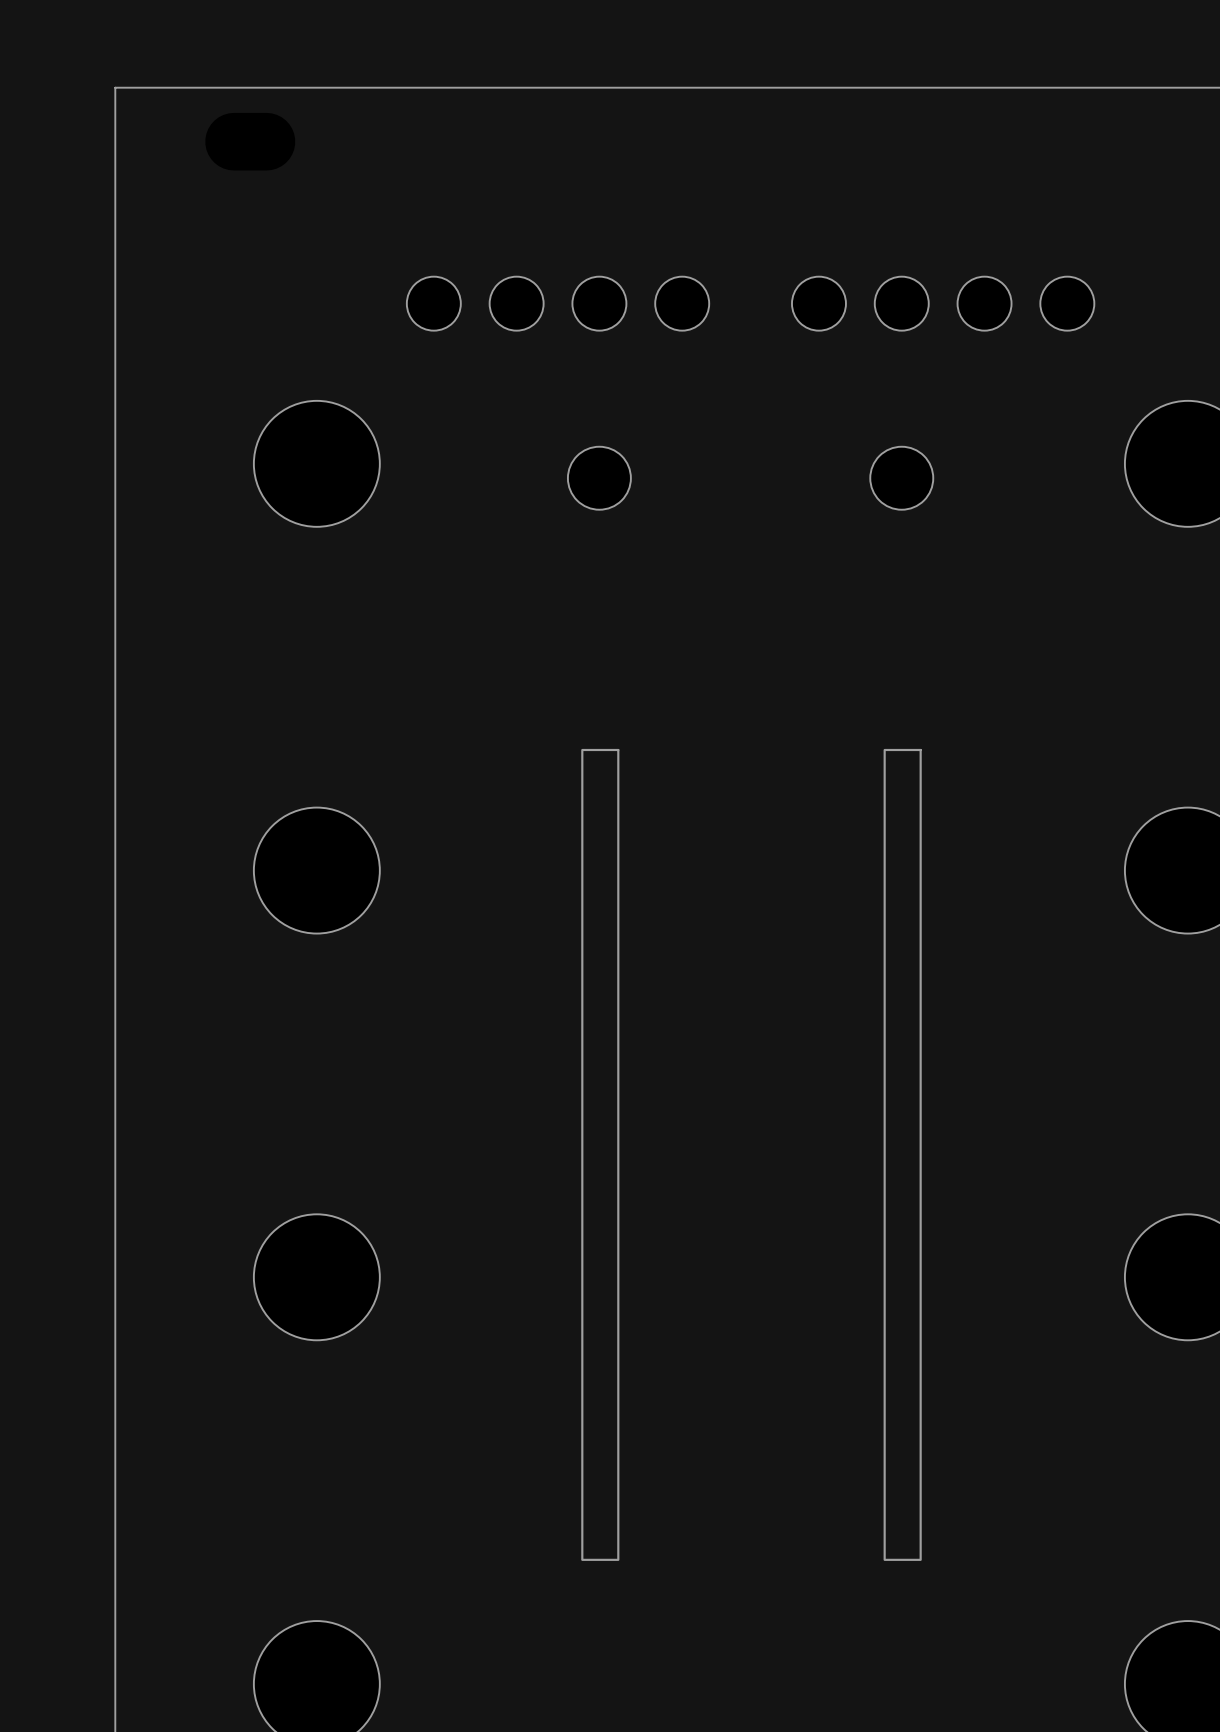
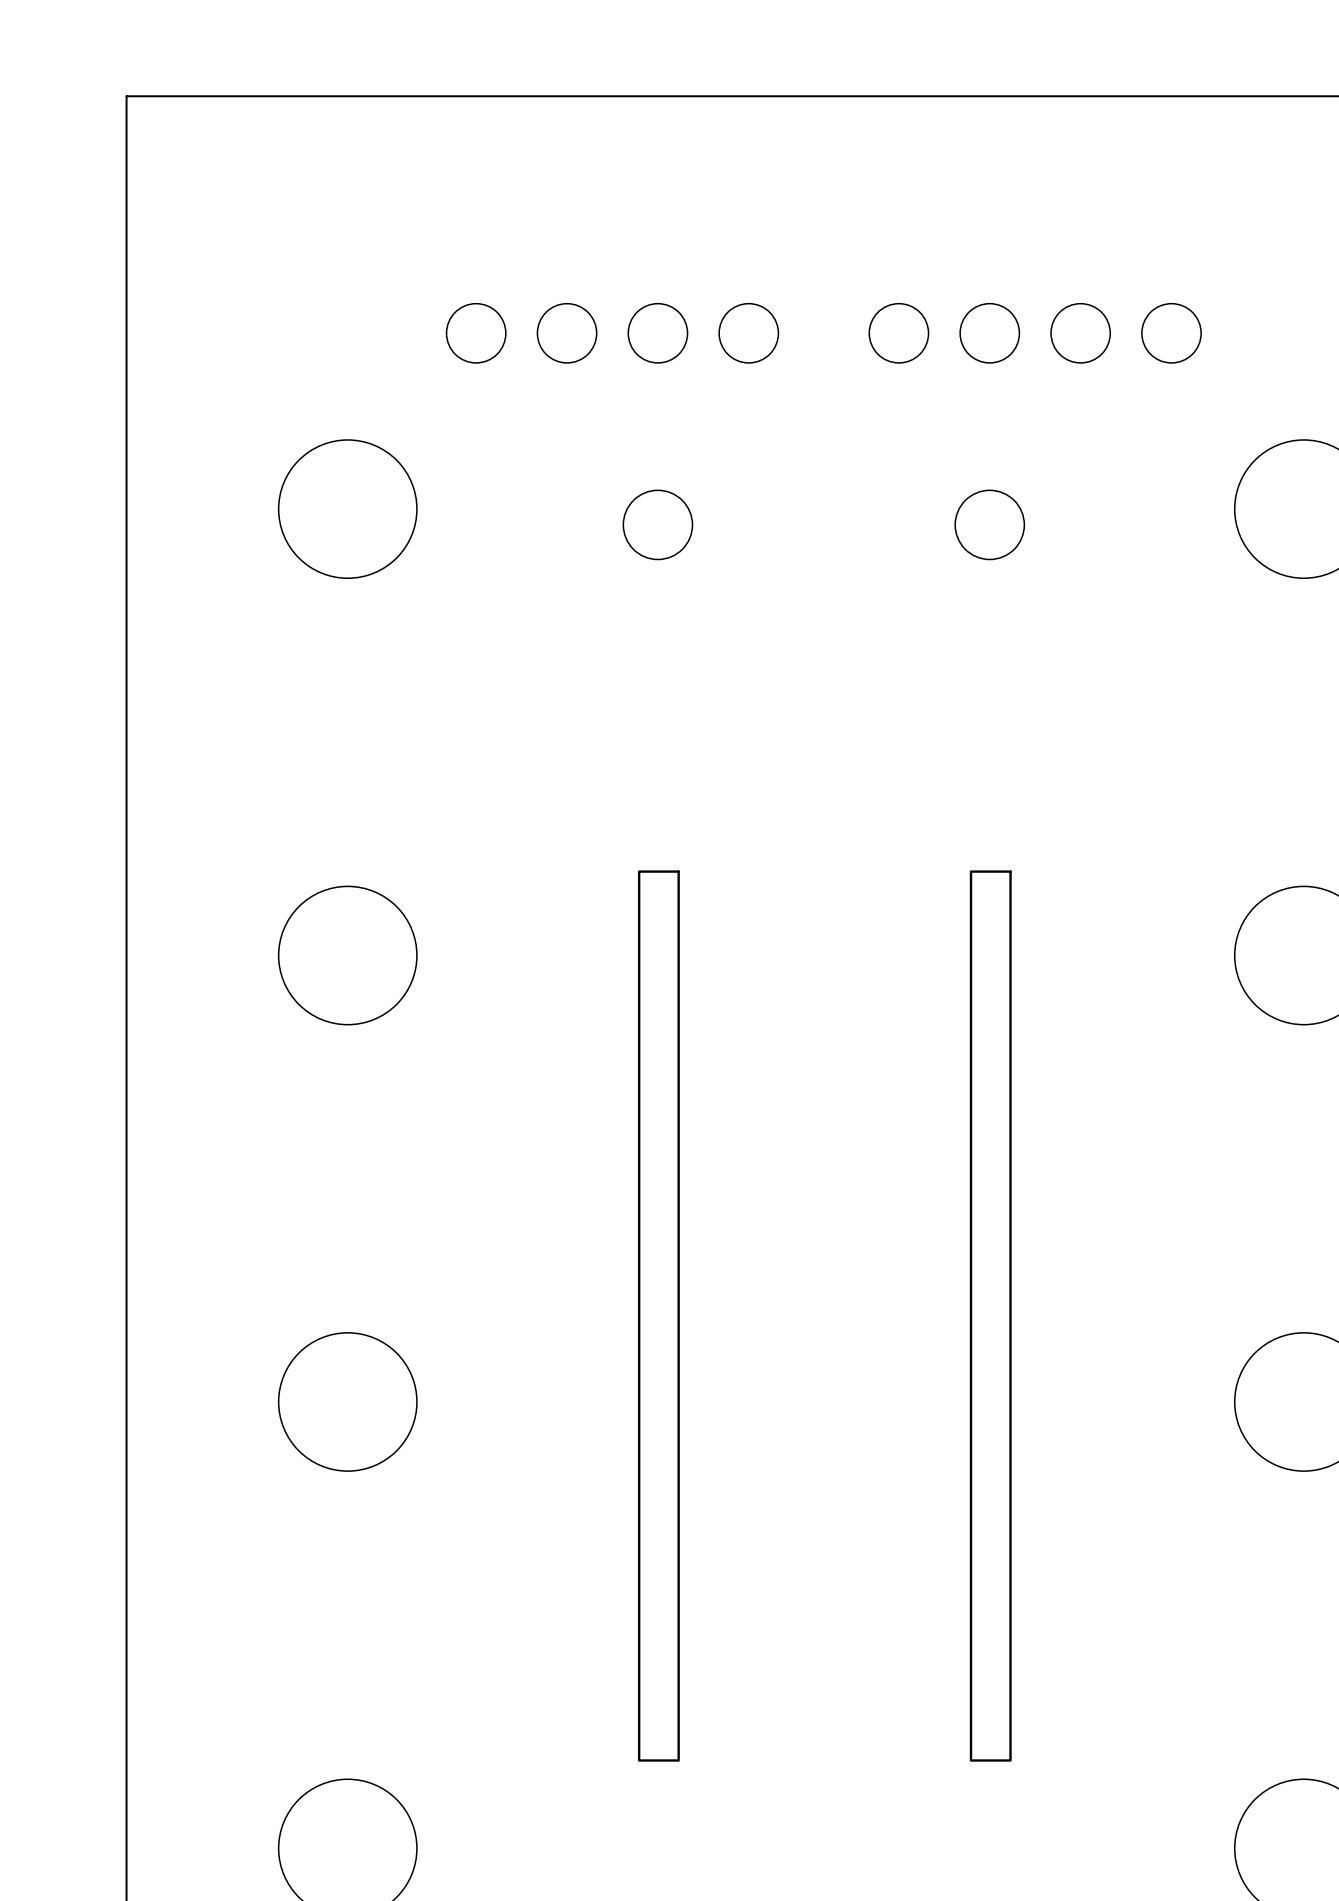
drawing position: (600, 1154) -> (658, 1316)
drawing position: (902, 1154) -> (990, 1316)

